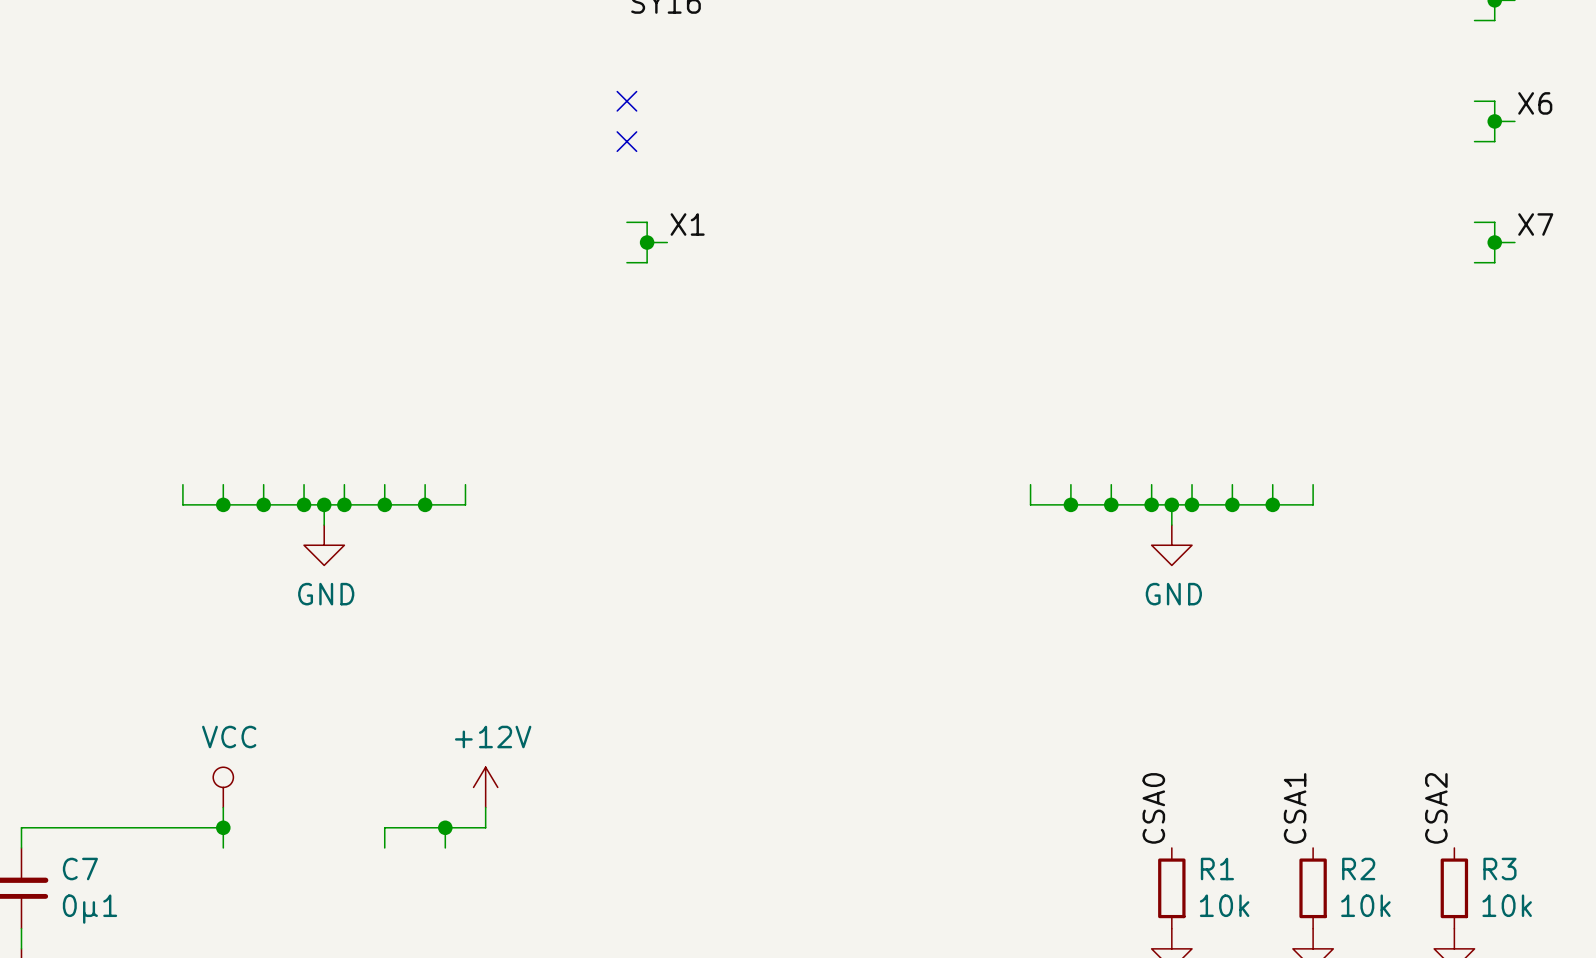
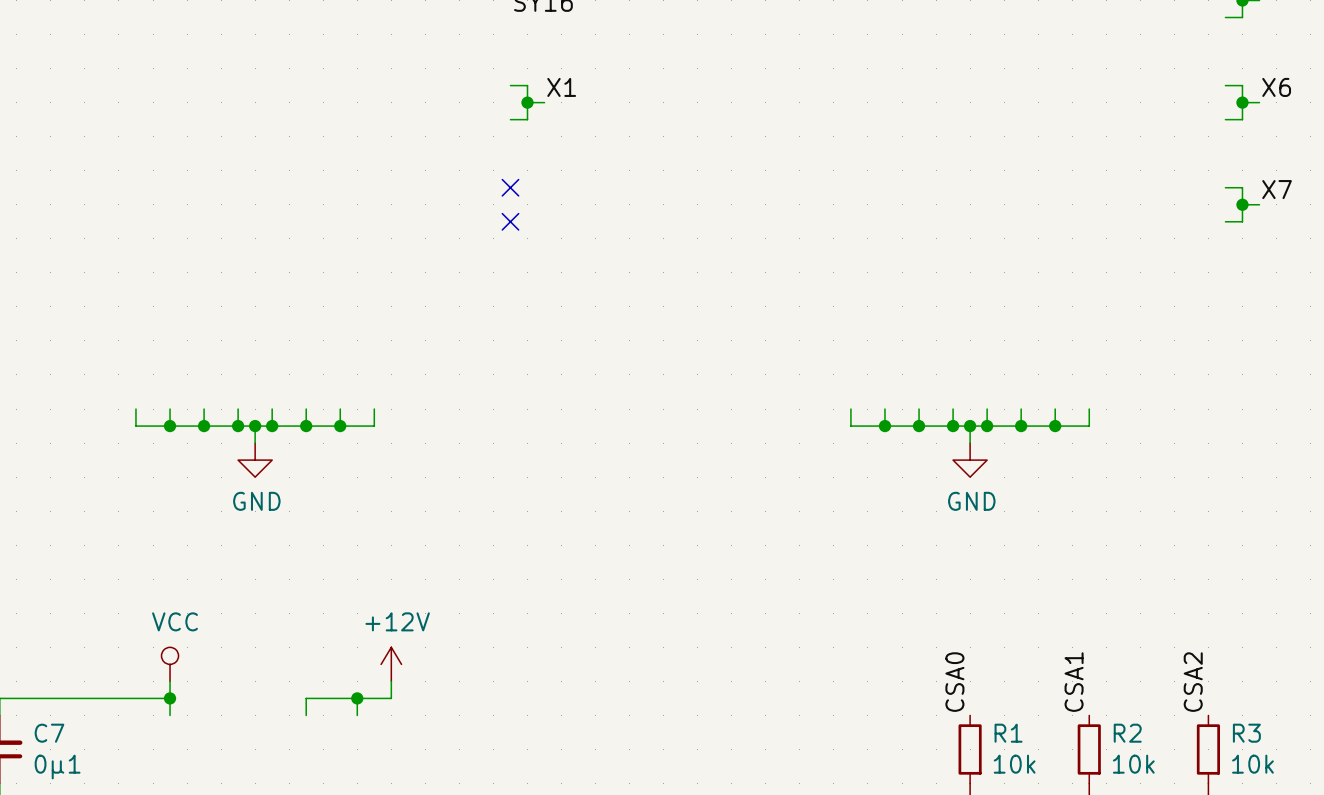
no-connect mark: (626, 101) -> none
junction: none -> (527, 102)
no-connect mark: (626, 141) -> none
wire: (626, 222) (647, 222) (647, 262) (626, 262) -> (510, 85) (527, 85) (527, 119) (510, 119)
no-connect mark: none -> (510, 187)
label position: X1 (687, 224) -> X1 (561, 87)
wire: (647, 242) (667, 242) -> (527, 102) (544, 102)
junction: (647, 242) -> none
no-connect mark: none -> (510, 221)

